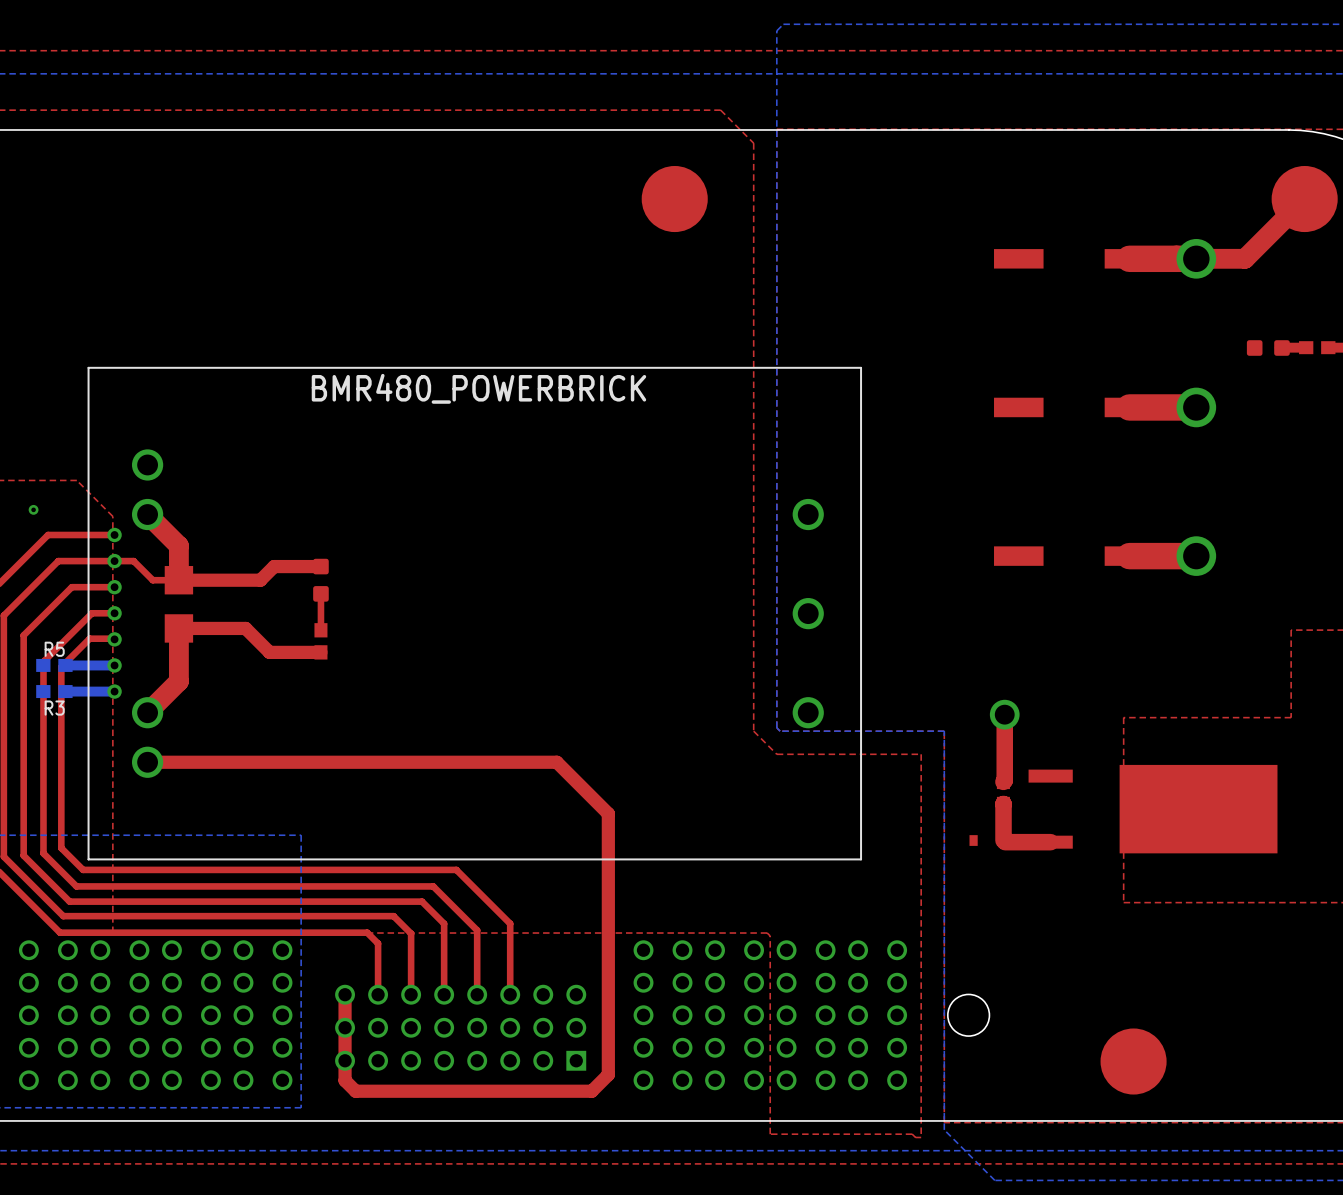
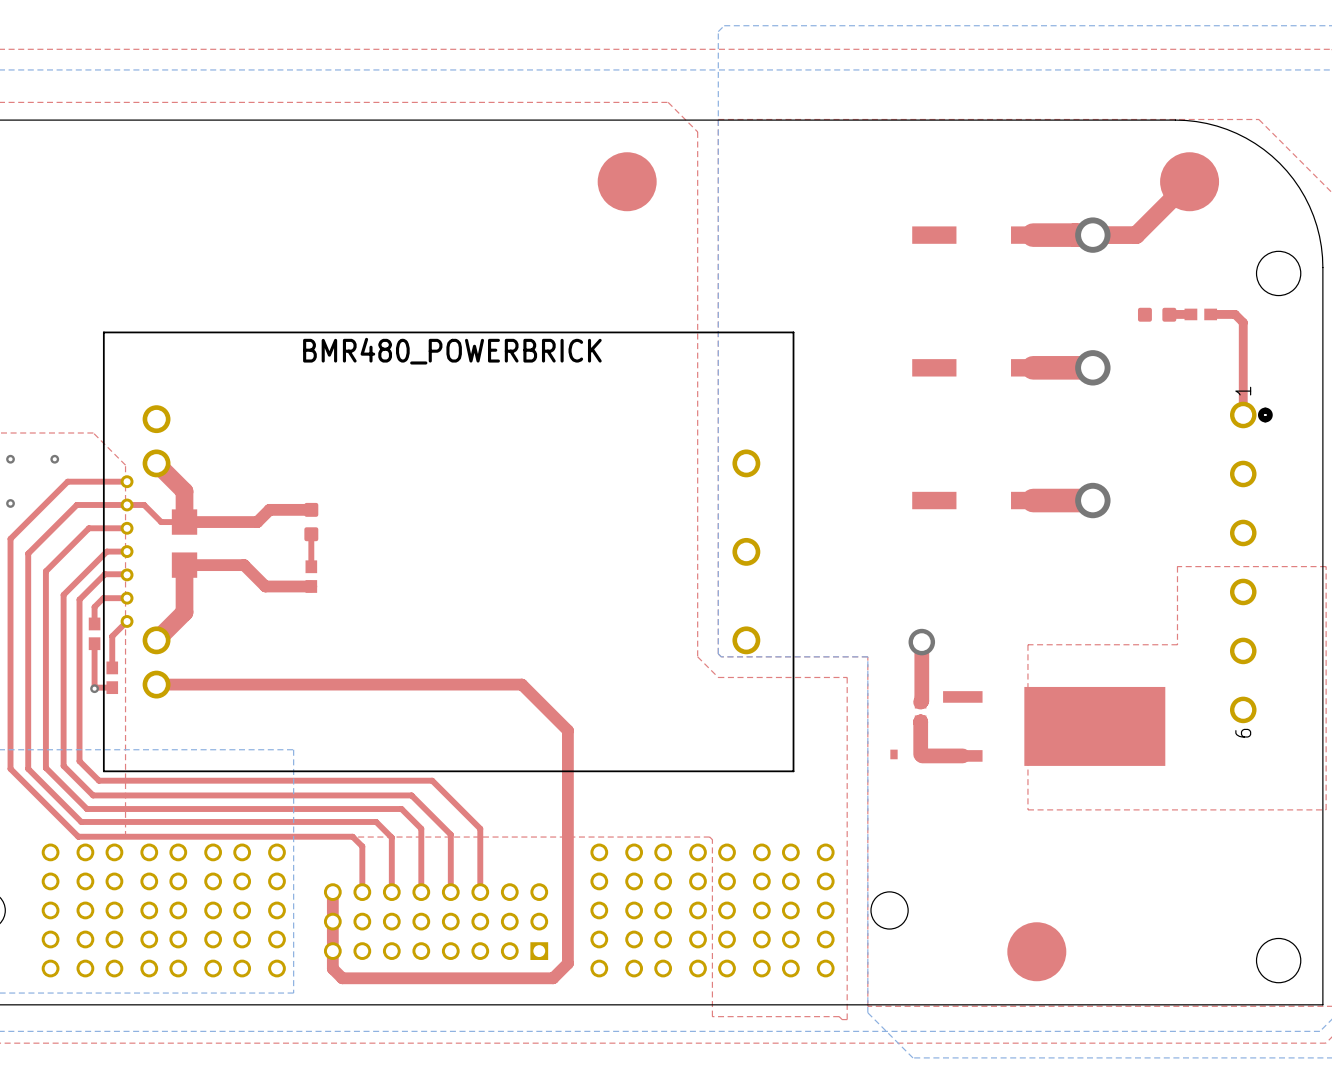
R5 side: bottom (54, 665) -> top (94, 633)
top track: none -> (127, 598) (103, 598) (94, 606) (94, 623)
bottom track: (114, 665) (65, 665) -> none
R3 side: bottom (54, 691) -> top (112, 677)
top track: none -> (127, 621) (112, 636) (112, 667)
bottom track: (114, 691) (65, 691) -> none
top track: none -> (94, 643) (94, 688) (112, 687)
via: none -> (94, 688)

